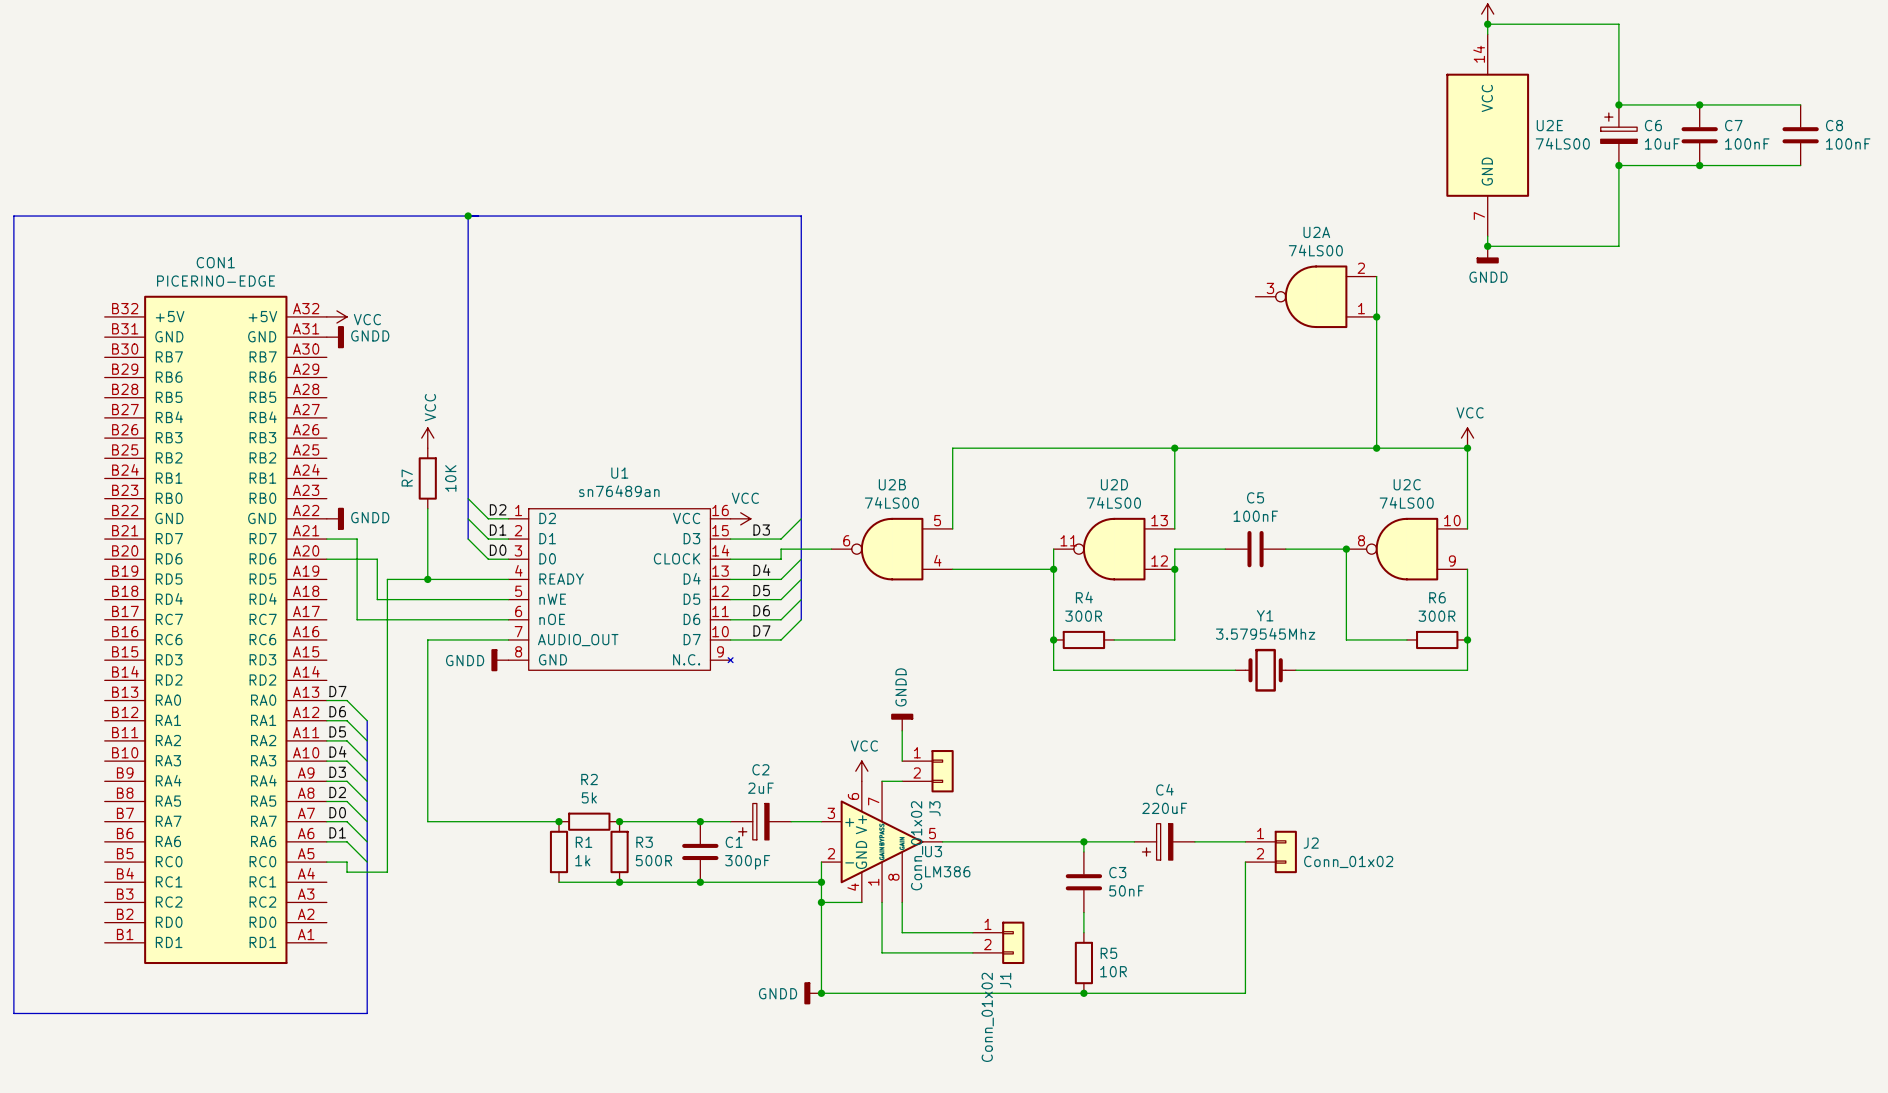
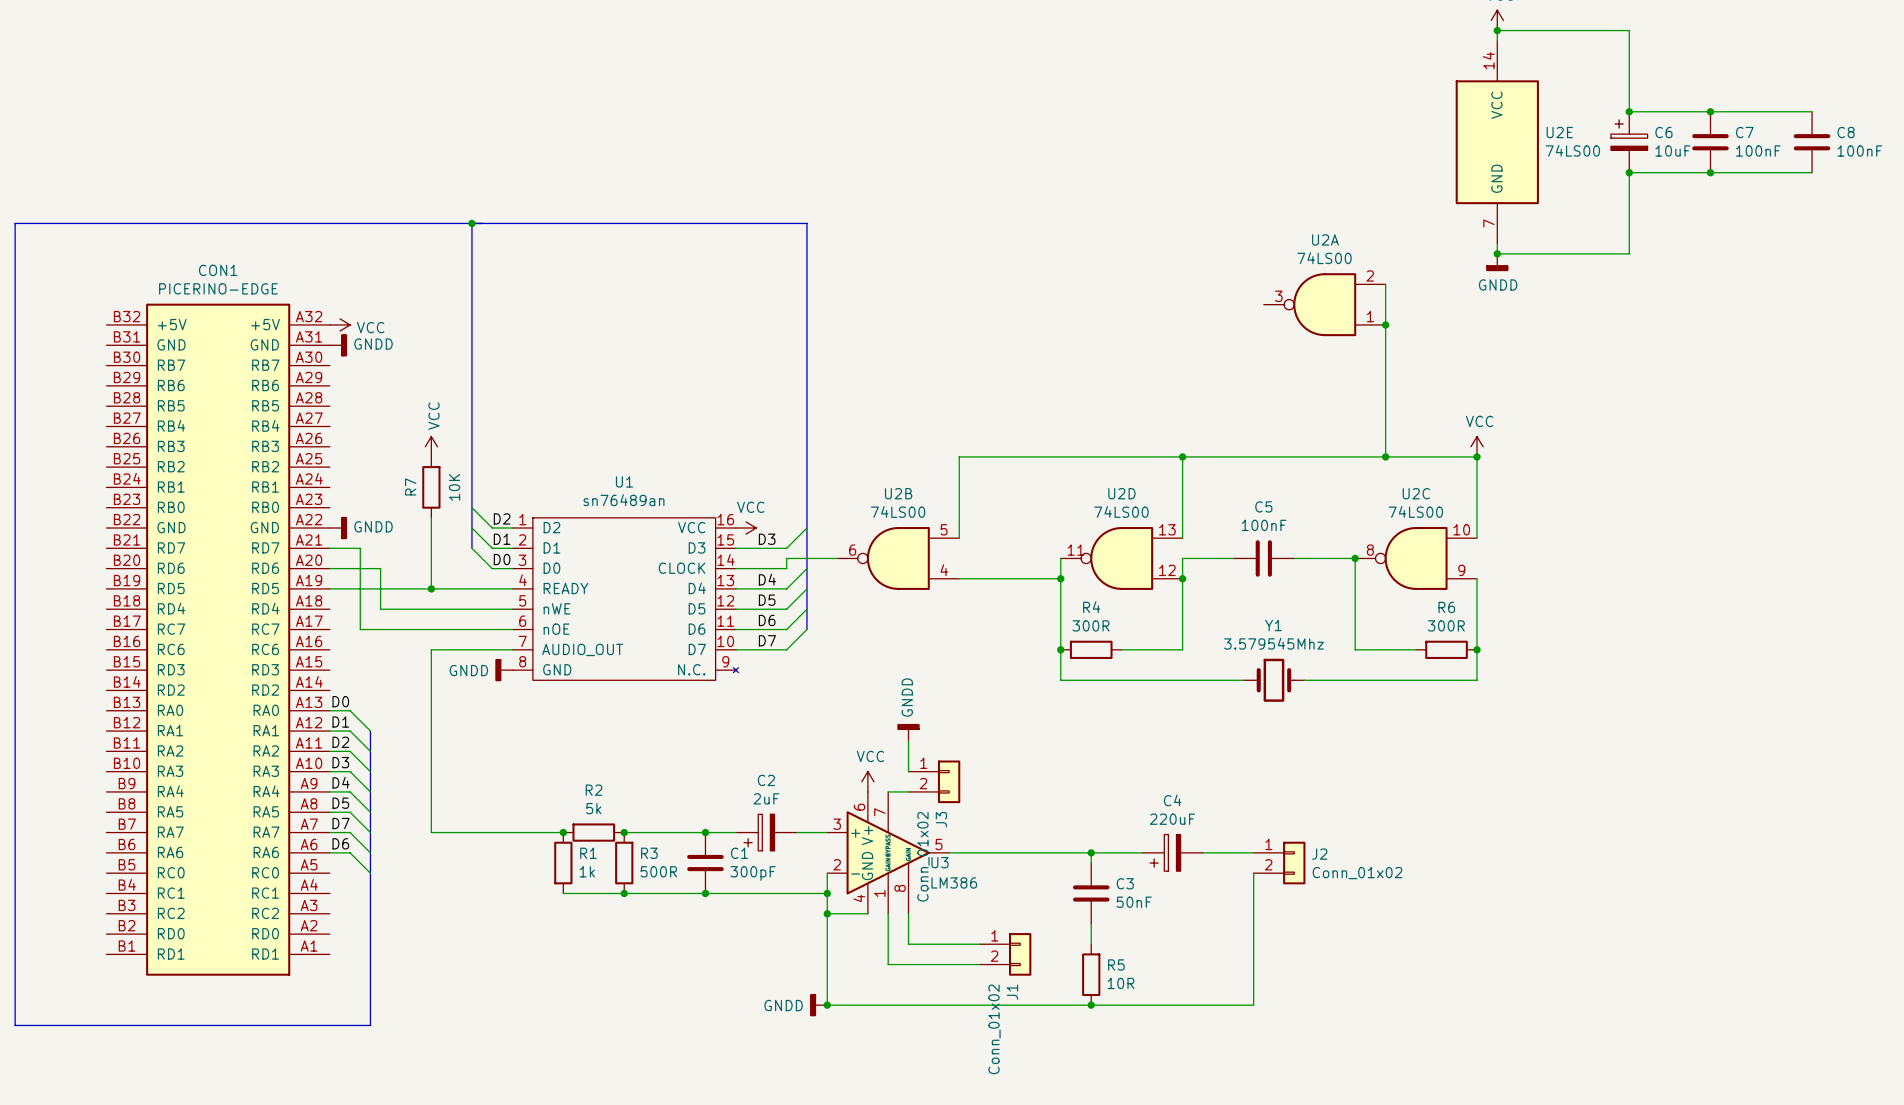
wire: (387, 579) (387, 872) (347, 872) (347, 862) (326, 862) -> (390, 588) (329, 588)
label: D7 (337, 691) -> D0 (340, 701)
label: D6 (337, 711) -> D1 (340, 721)
label: D5 (337, 731) -> D2 (340, 742)
label: D4 (337, 751) -> D3 (340, 762)
label: D3 (337, 772) -> D4 (341, 782)
label: D2 (337, 792) -> D5 (340, 803)
label: D0 (337, 812) -> D7 (341, 823)
label: D1 (337, 832) -> D6 (340, 843)

